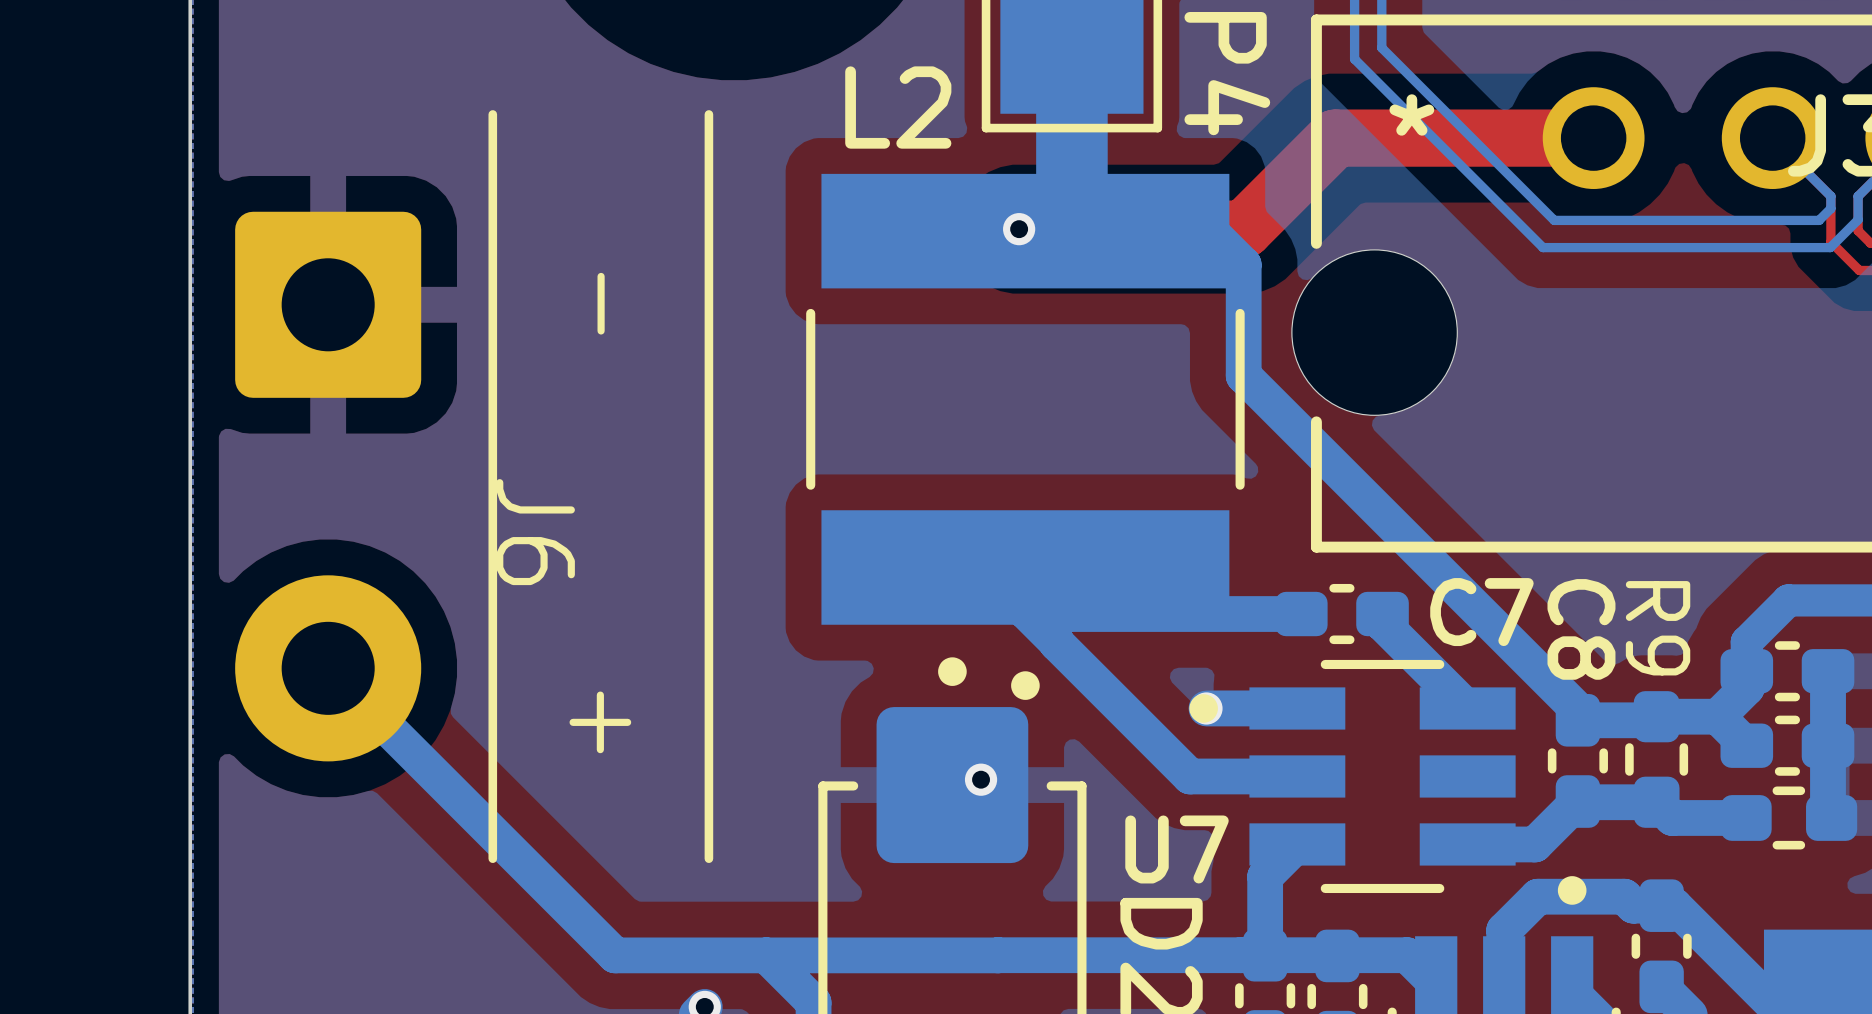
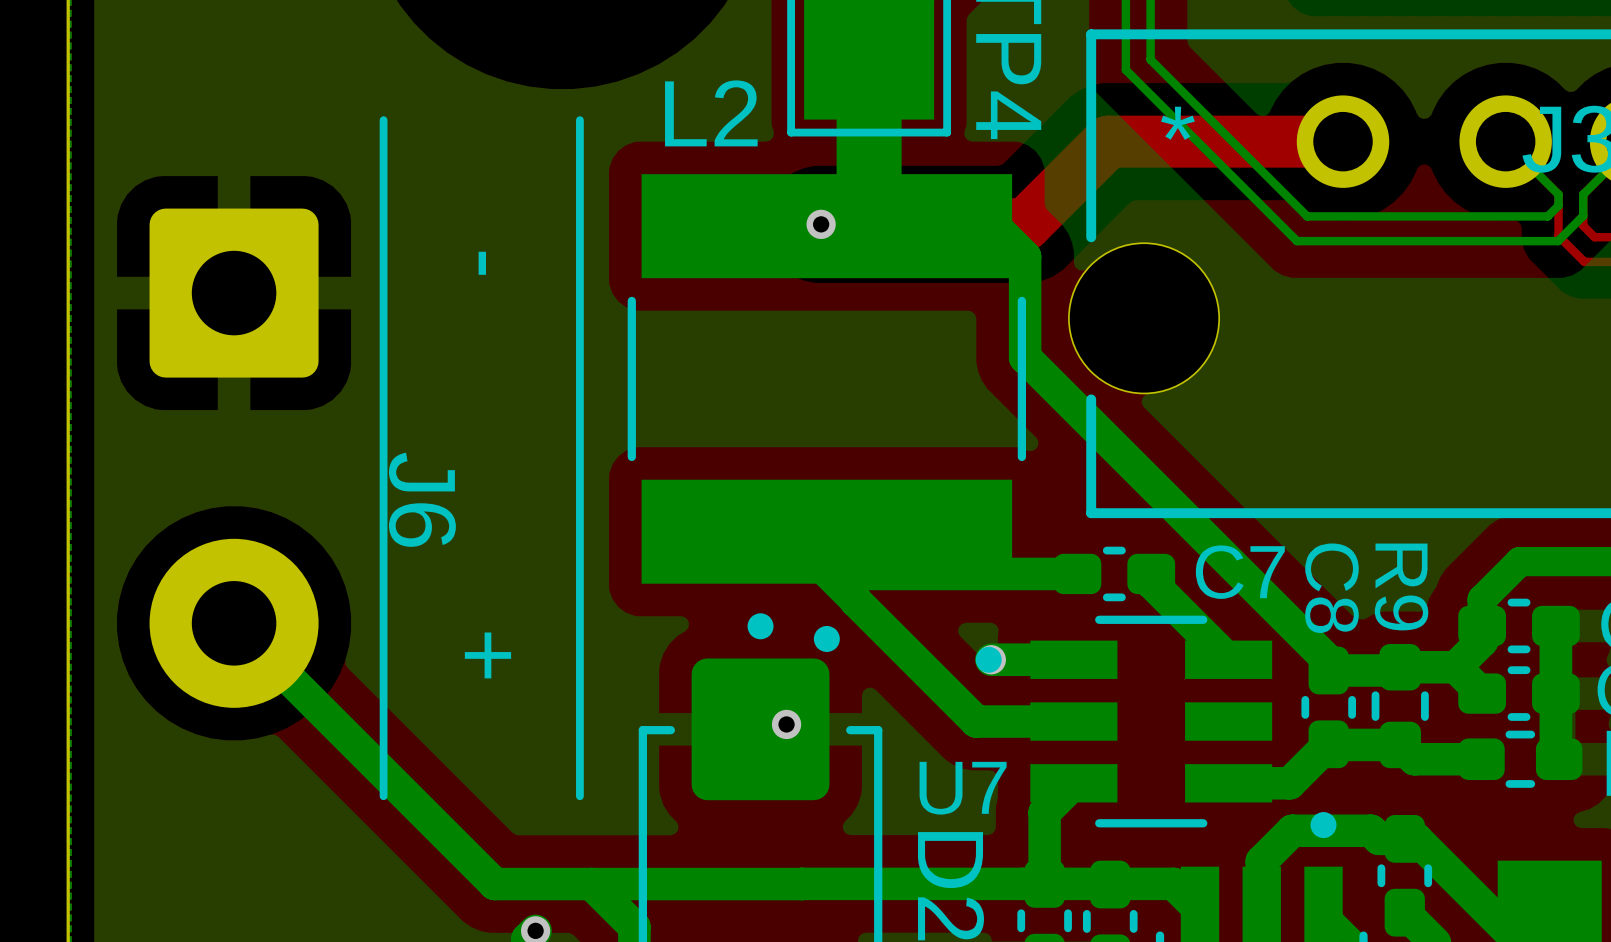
J6 position: (474, 486) -> (366, 458)
bottom track: (328, 668) (615, 955) (659, 955) -> (234, 623) (494, 884)

